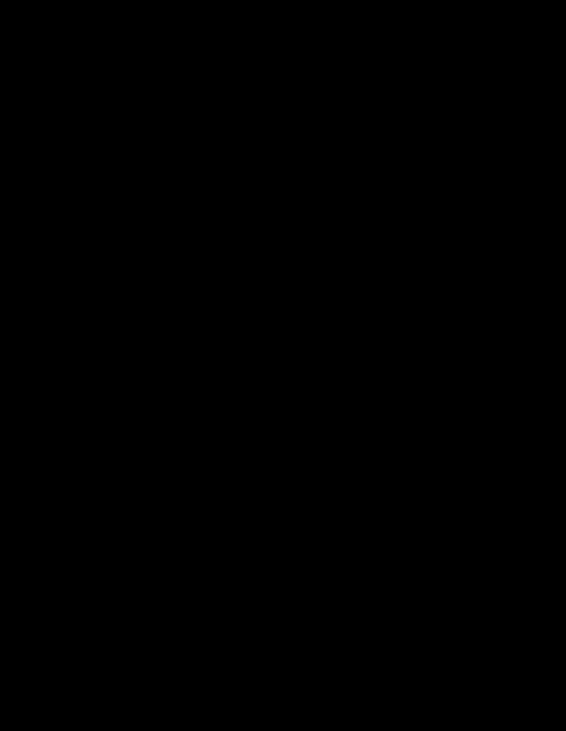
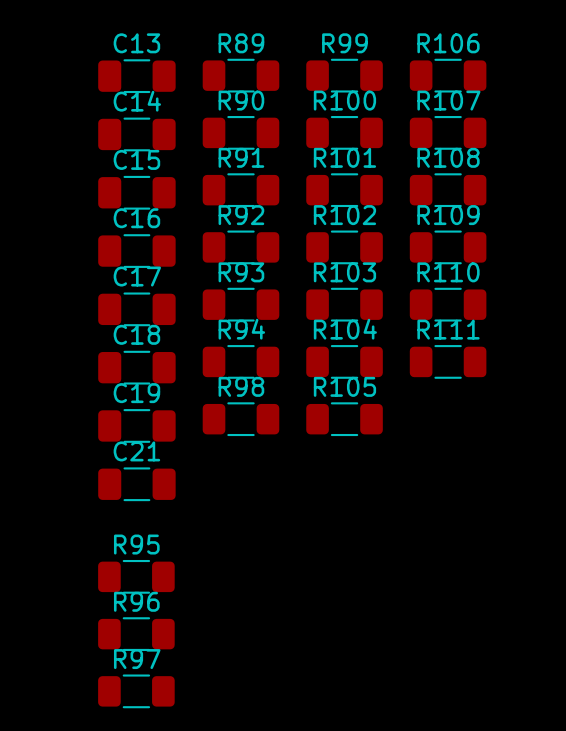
R89: none -> (240, 75)
R99: none -> (344, 75)
R106: none -> (448, 75)
C13: none -> (136, 76)
R90: none -> (240, 132)
R100: none -> (344, 132)
R107: none -> (448, 132)
C14: none -> (136, 134)
R91: none -> (240, 190)
R101: none -> (344, 190)
R108: none -> (448, 190)
C15: none -> (136, 192)
R92: none -> (240, 247)
R102: none -> (344, 247)
R109: none -> (448, 247)
C16: none -> (136, 251)
R93: none -> (240, 304)
R103: none -> (344, 304)
R110: none -> (448, 304)
C17: none -> (136, 309)
R94: none -> (240, 361)
R104: none -> (344, 361)
R111: none -> (448, 361)
C18: none -> (136, 367)
R98: none -> (240, 419)
R105: none -> (344, 419)
C19: none -> (136, 425)
C21: none -> (136, 484)
R95: none -> (136, 576)
R96: none -> (136, 634)
R97: none -> (136, 691)

